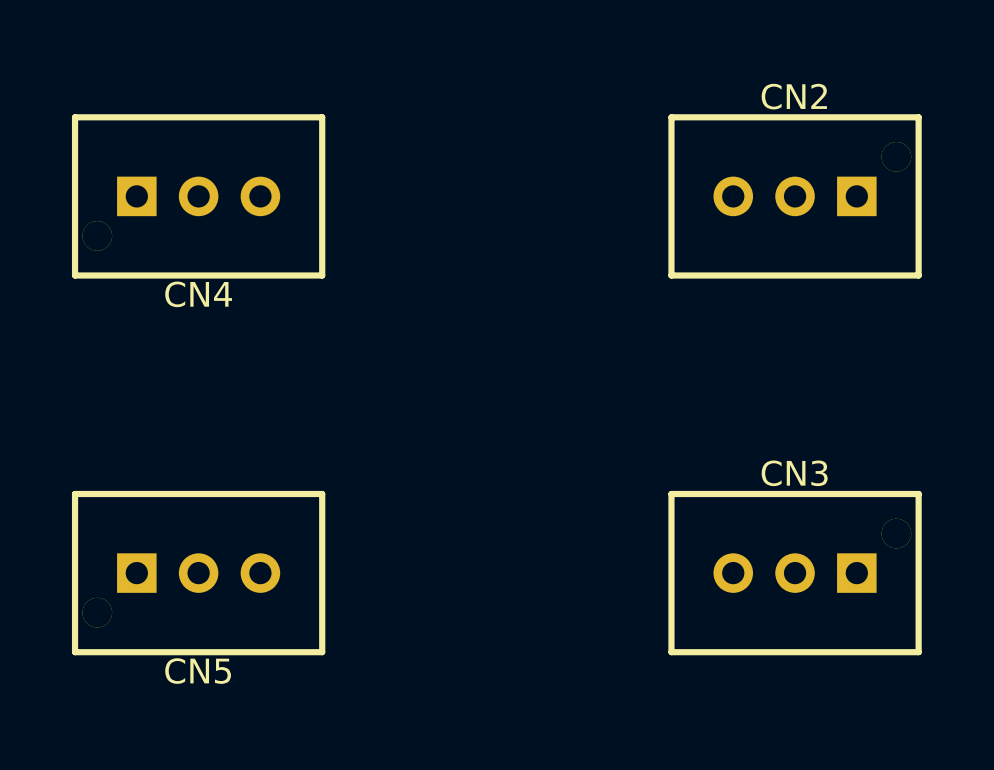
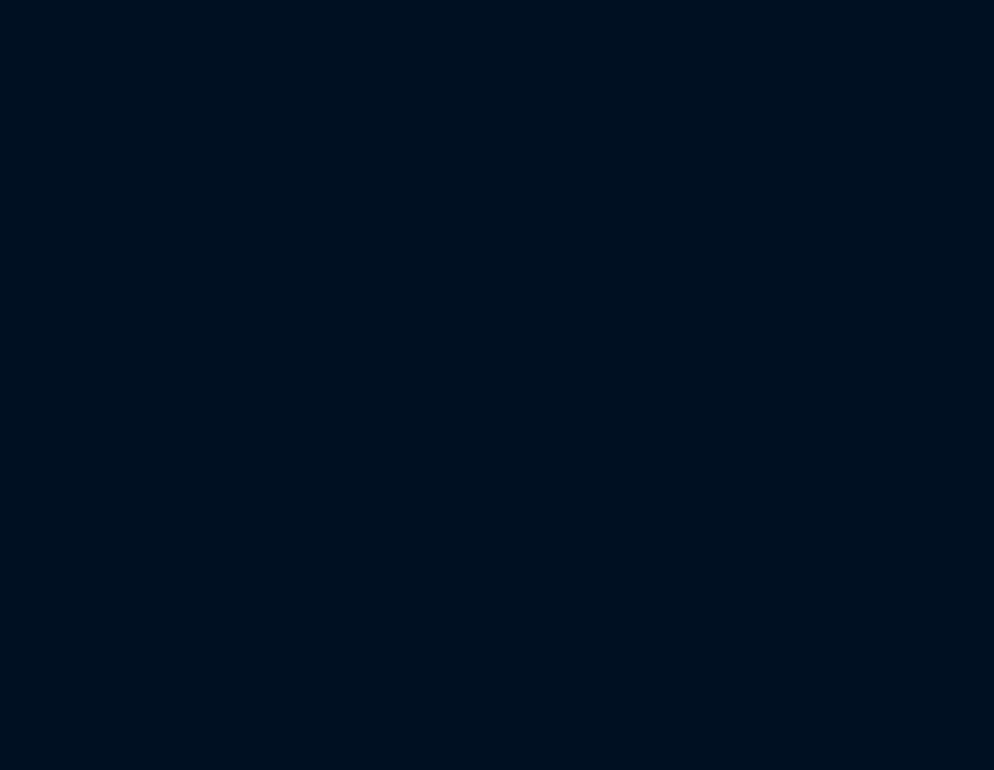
CN4: (198, 196) -> none
CN2: (795, 196) -> none
CN5: (198, 573) -> none
CN3: (795, 573) -> none

